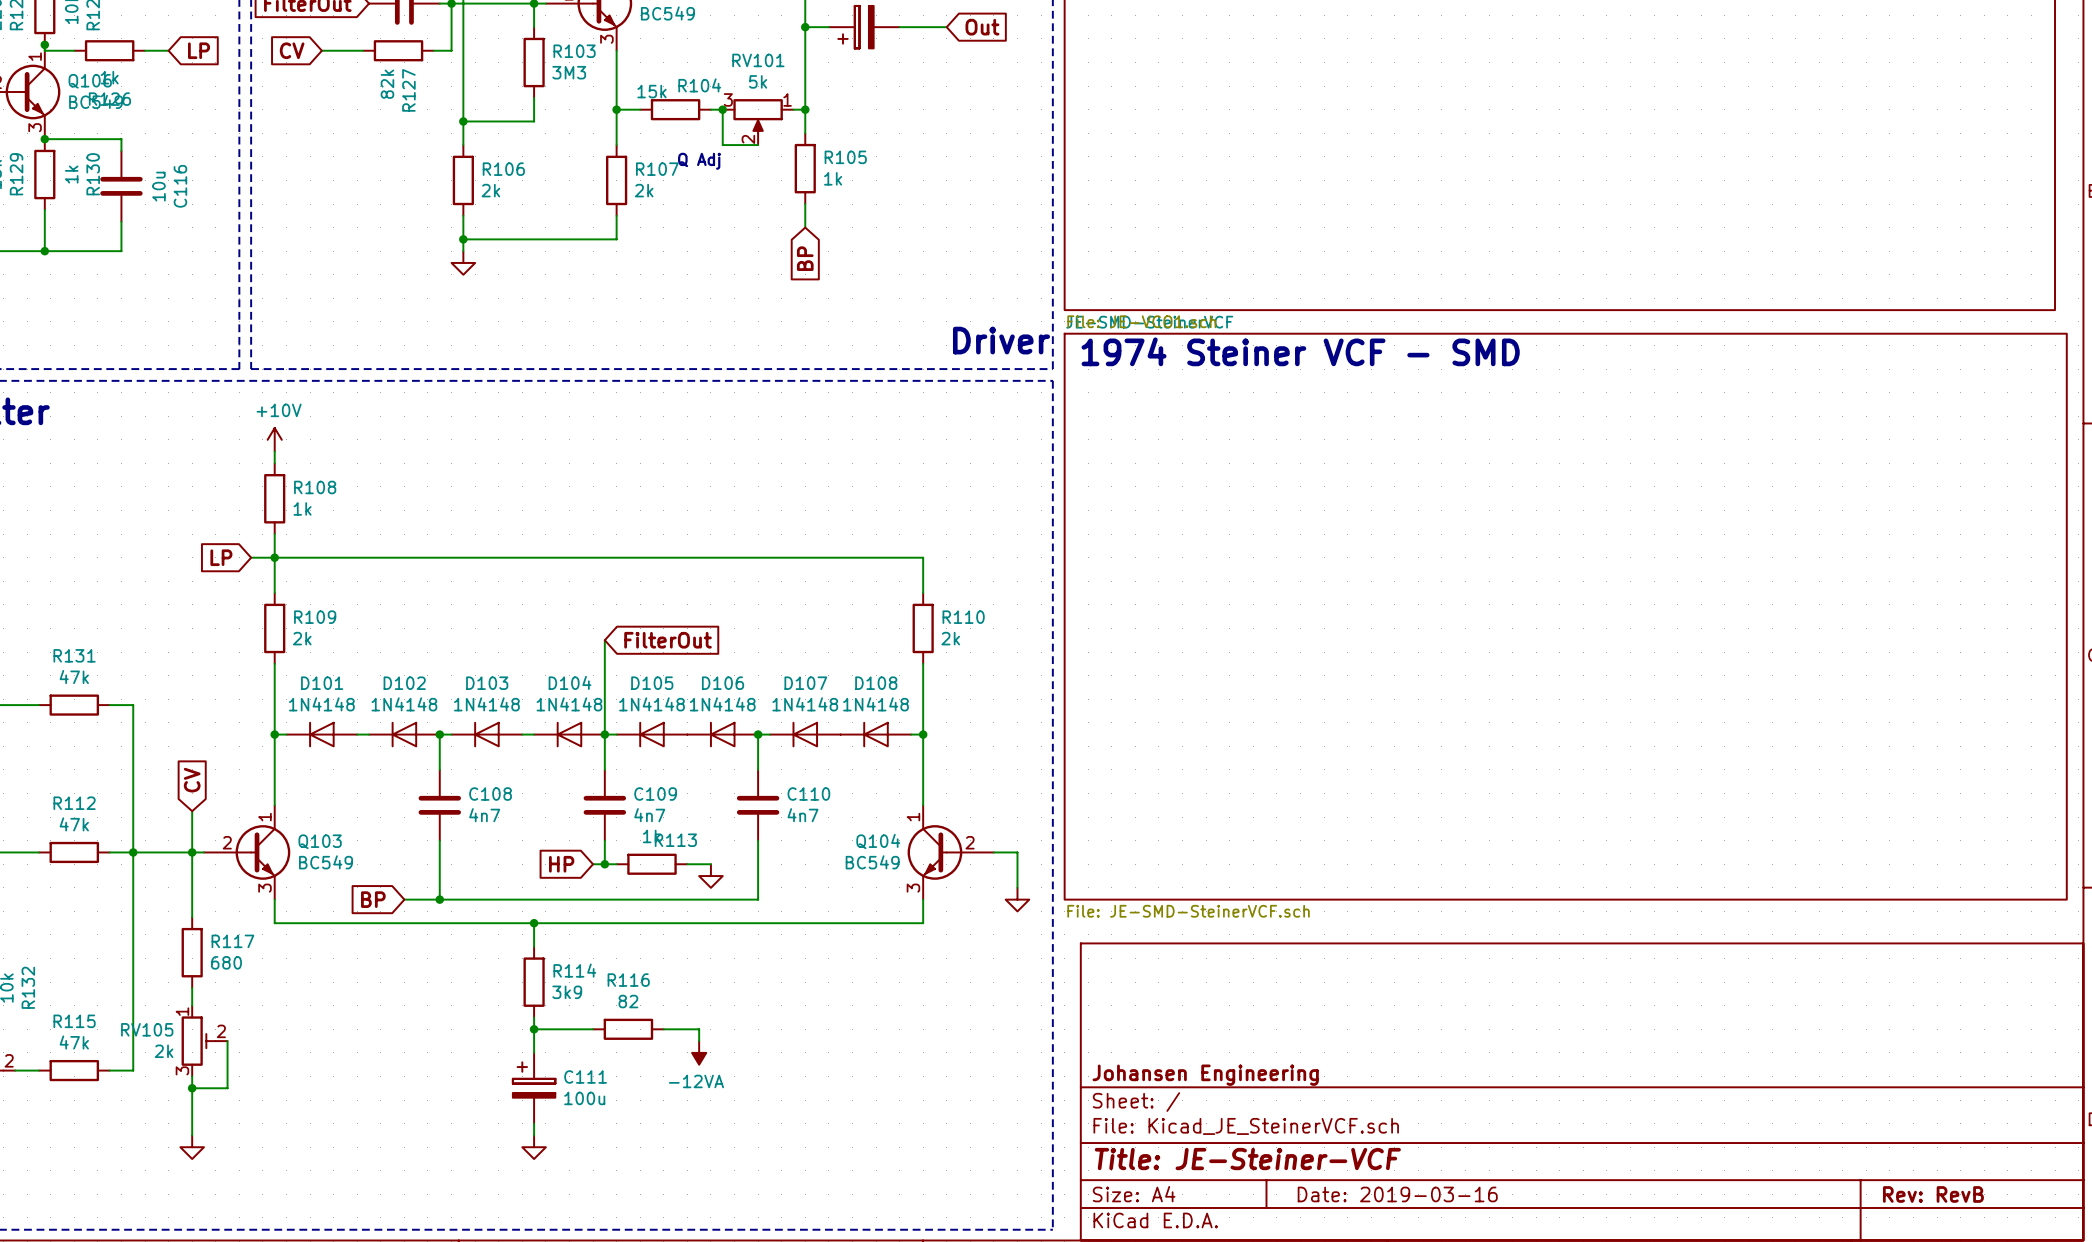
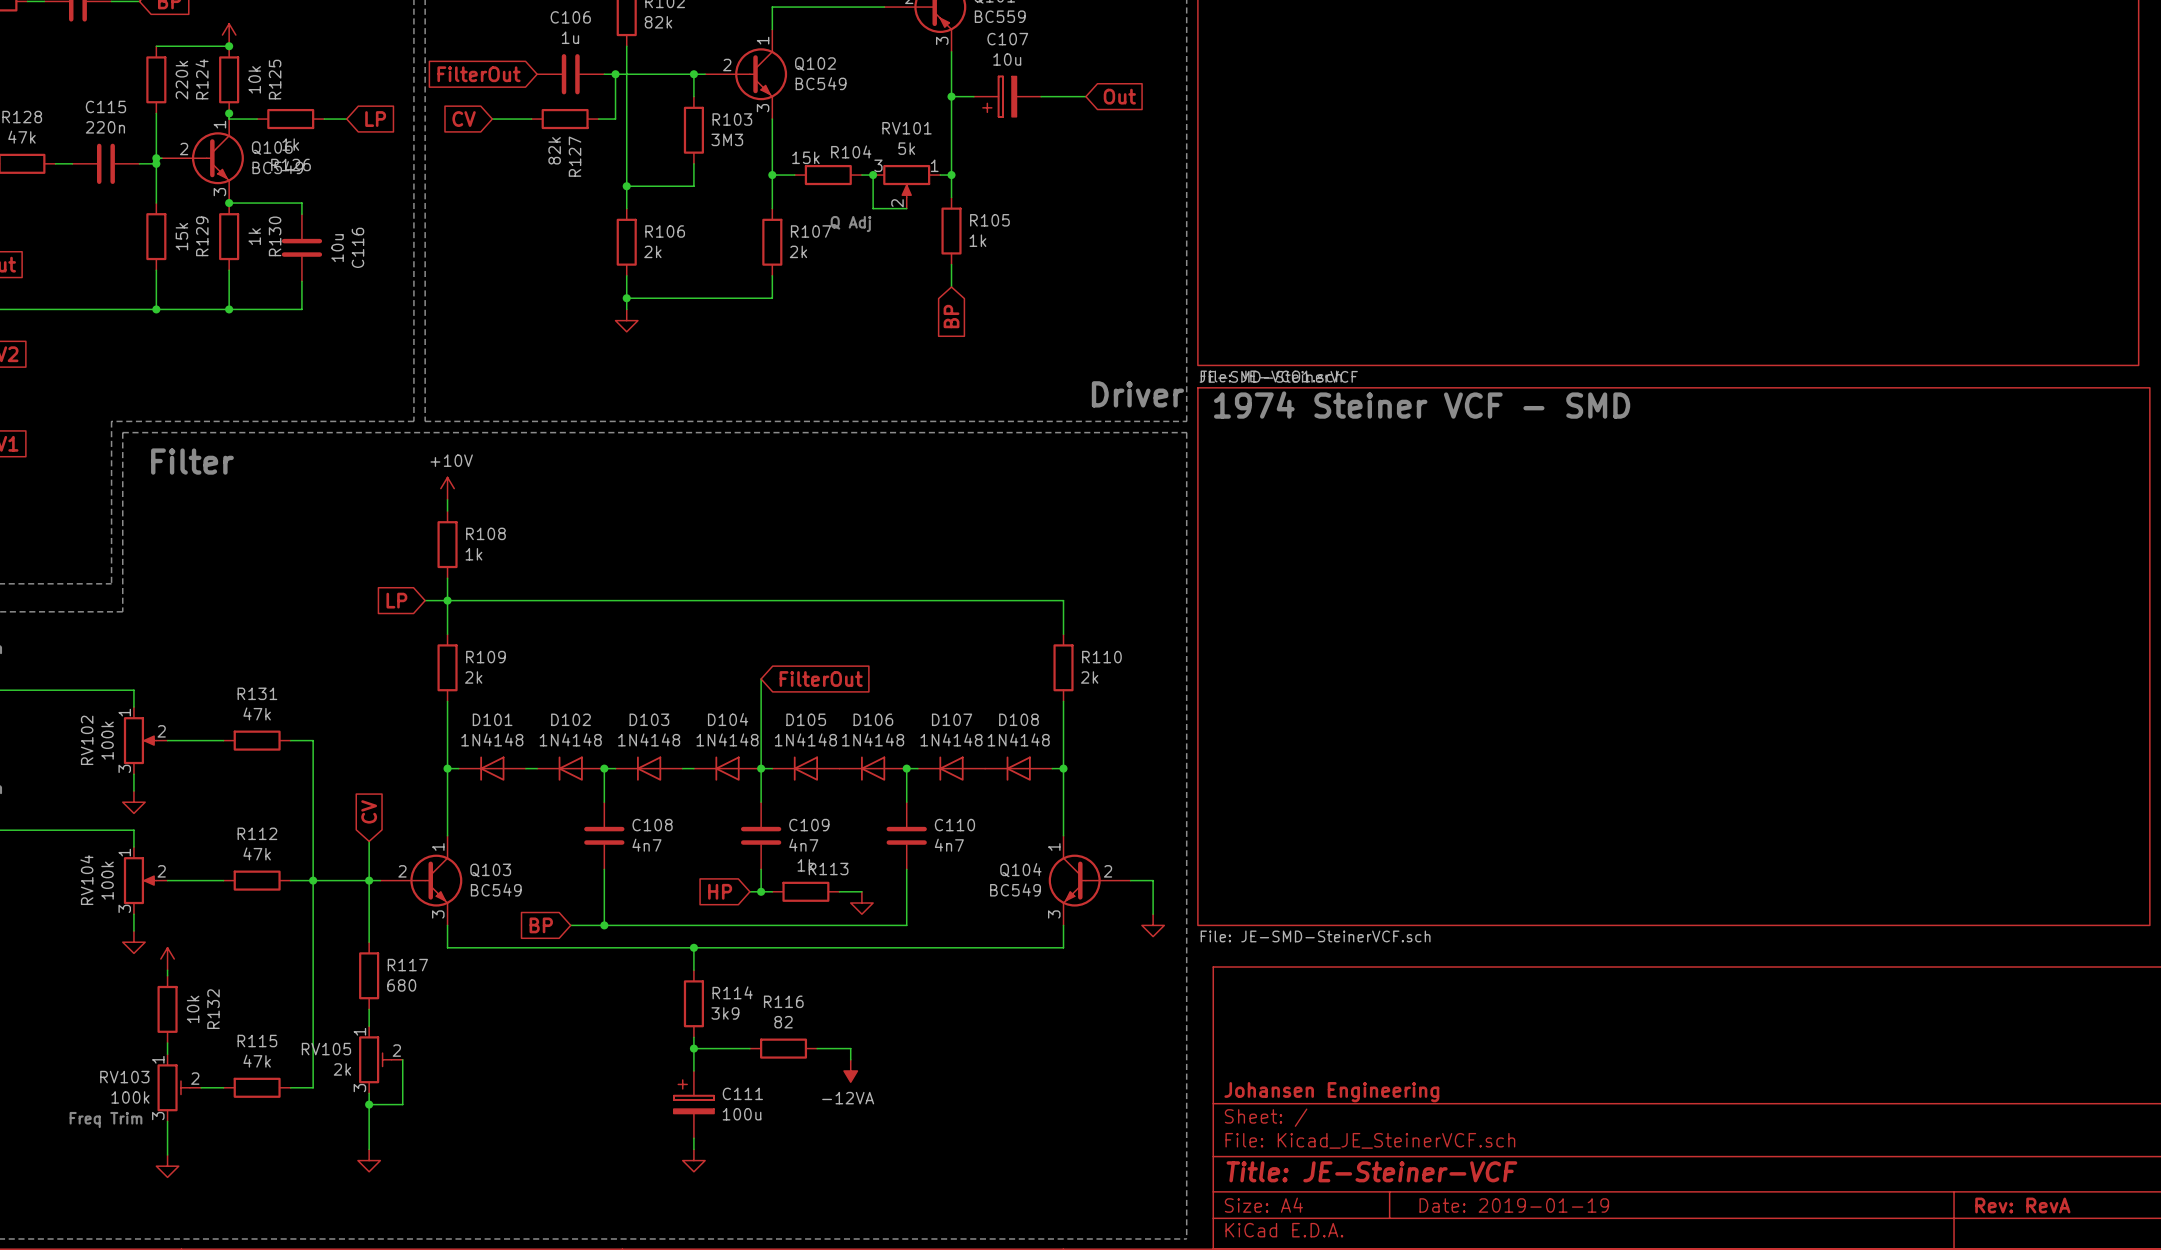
title block: Date: 2019-03-16 (1397, 1194) -> Date: 2019-01-19 (1514, 1205)
title block: Rev: RevB (1933, 1194) -> Rev: RevA (2022, 1205)

